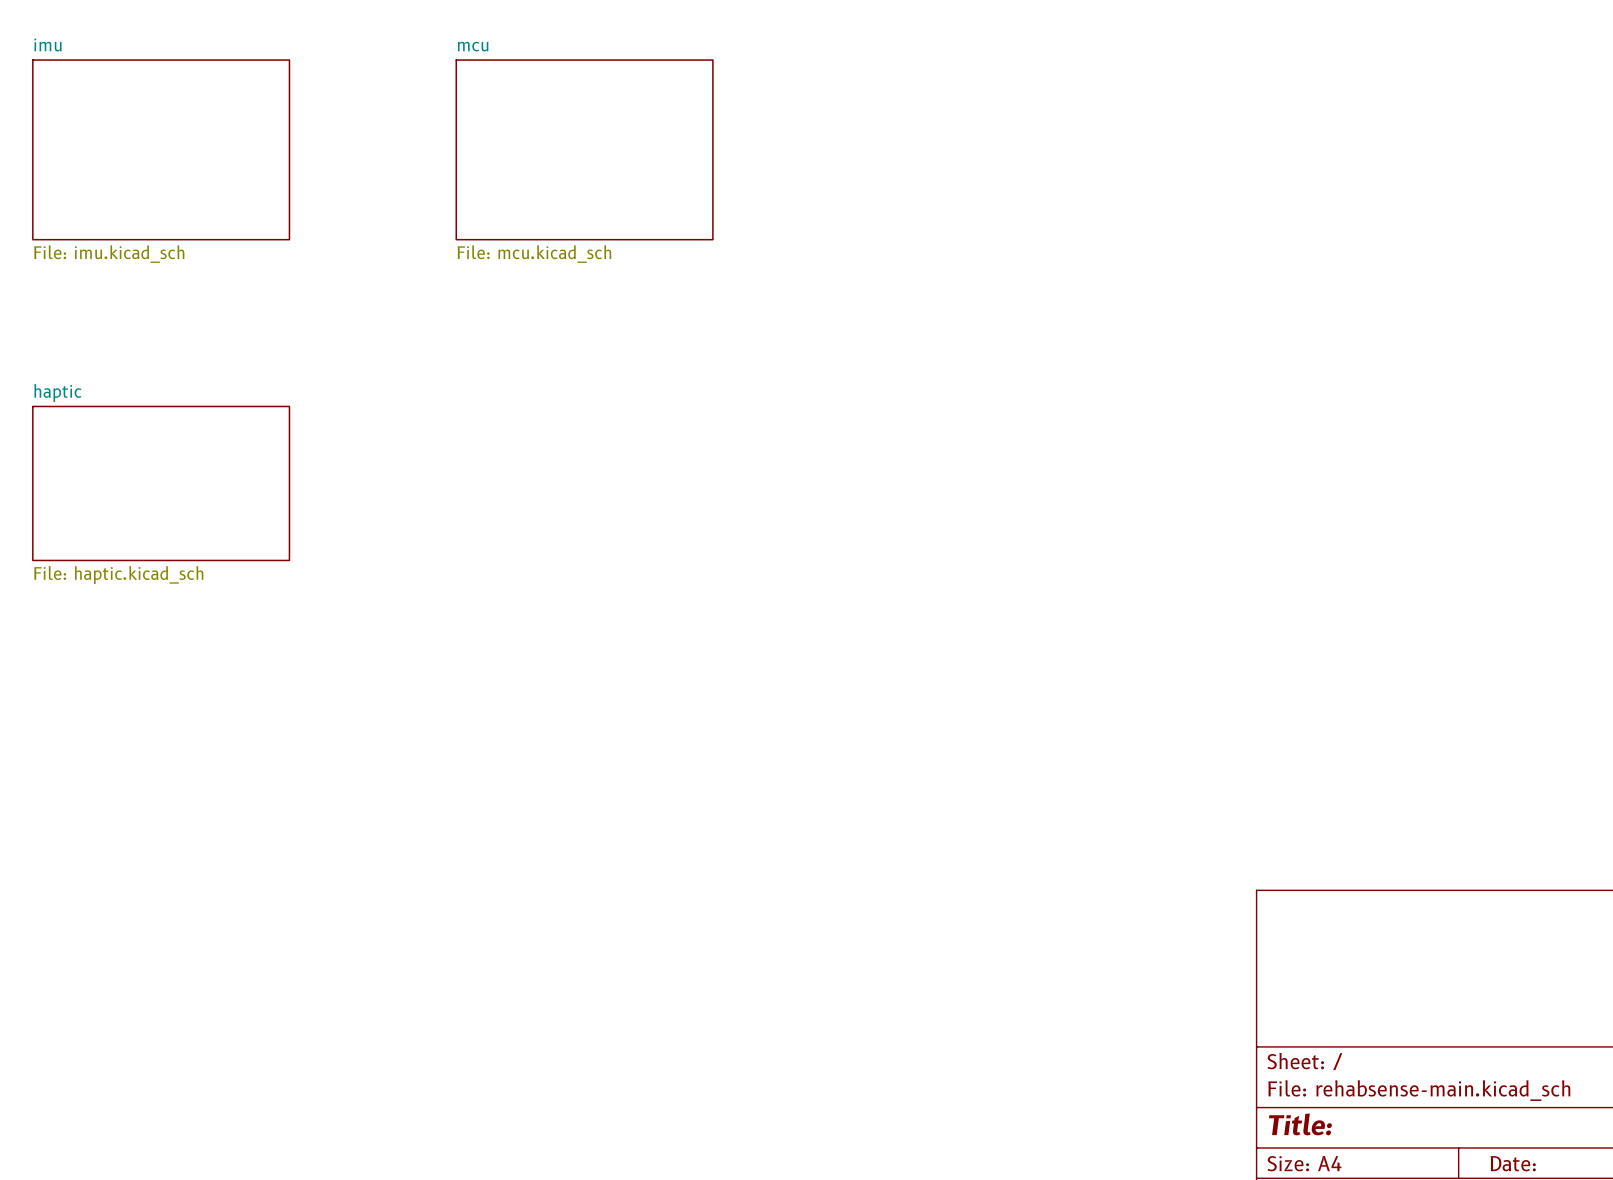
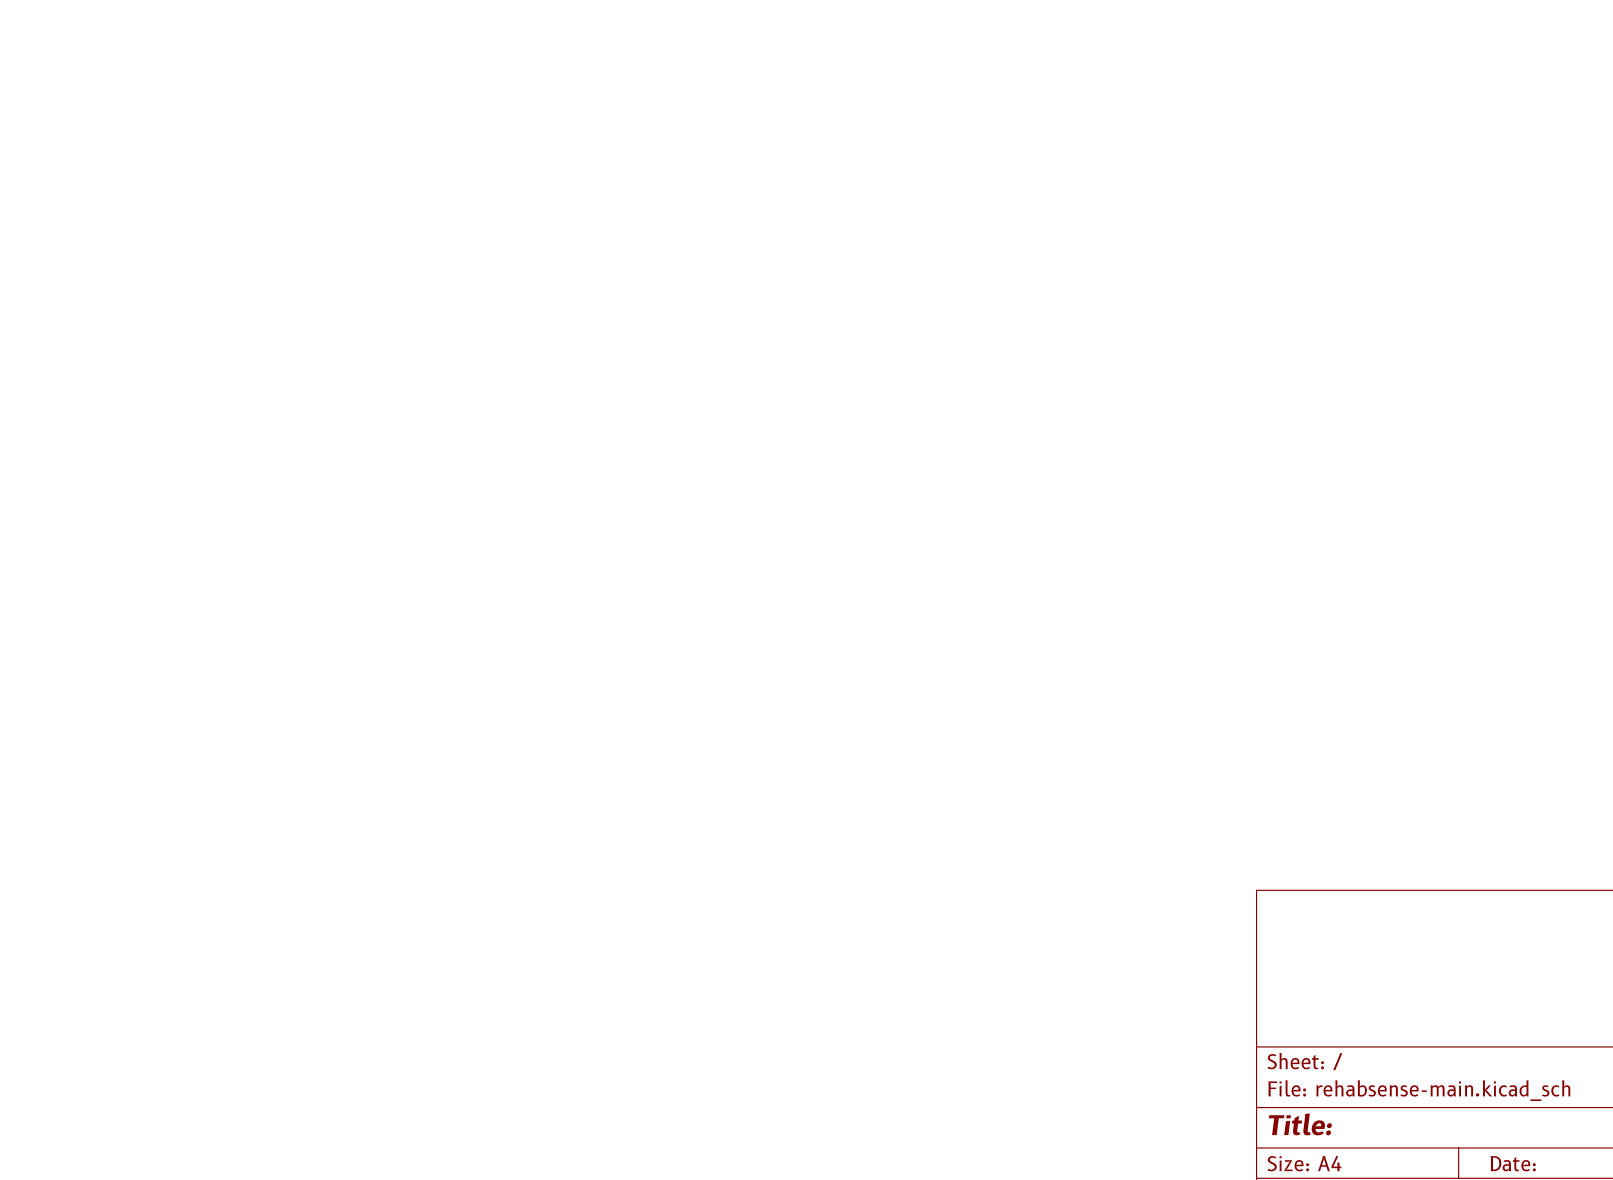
sheet imu: File: imu.kicad_sch (161, 149) -> none
sheet mcu: File: mcu.kicad_sch (584, 149) -> none
sheet haptic: File: haptic.kicad_sch (161, 483) -> none

